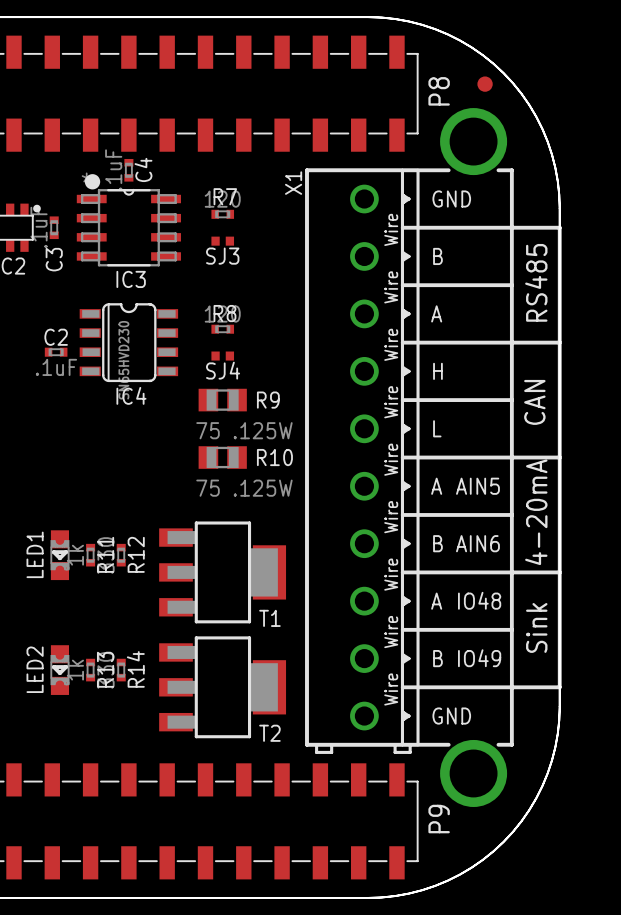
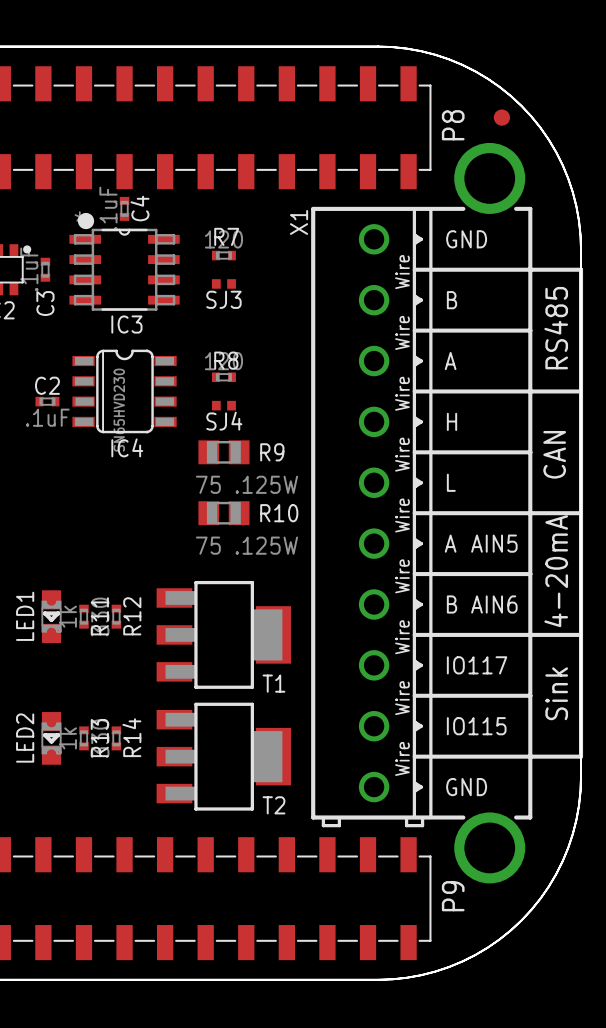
text: IO48 (479, 600) -> none
text: A (436, 601) -> IO117 (477, 665)
text: B (437, 658) -> IO115 (476, 726)
text: IO49 (479, 658) -> none

